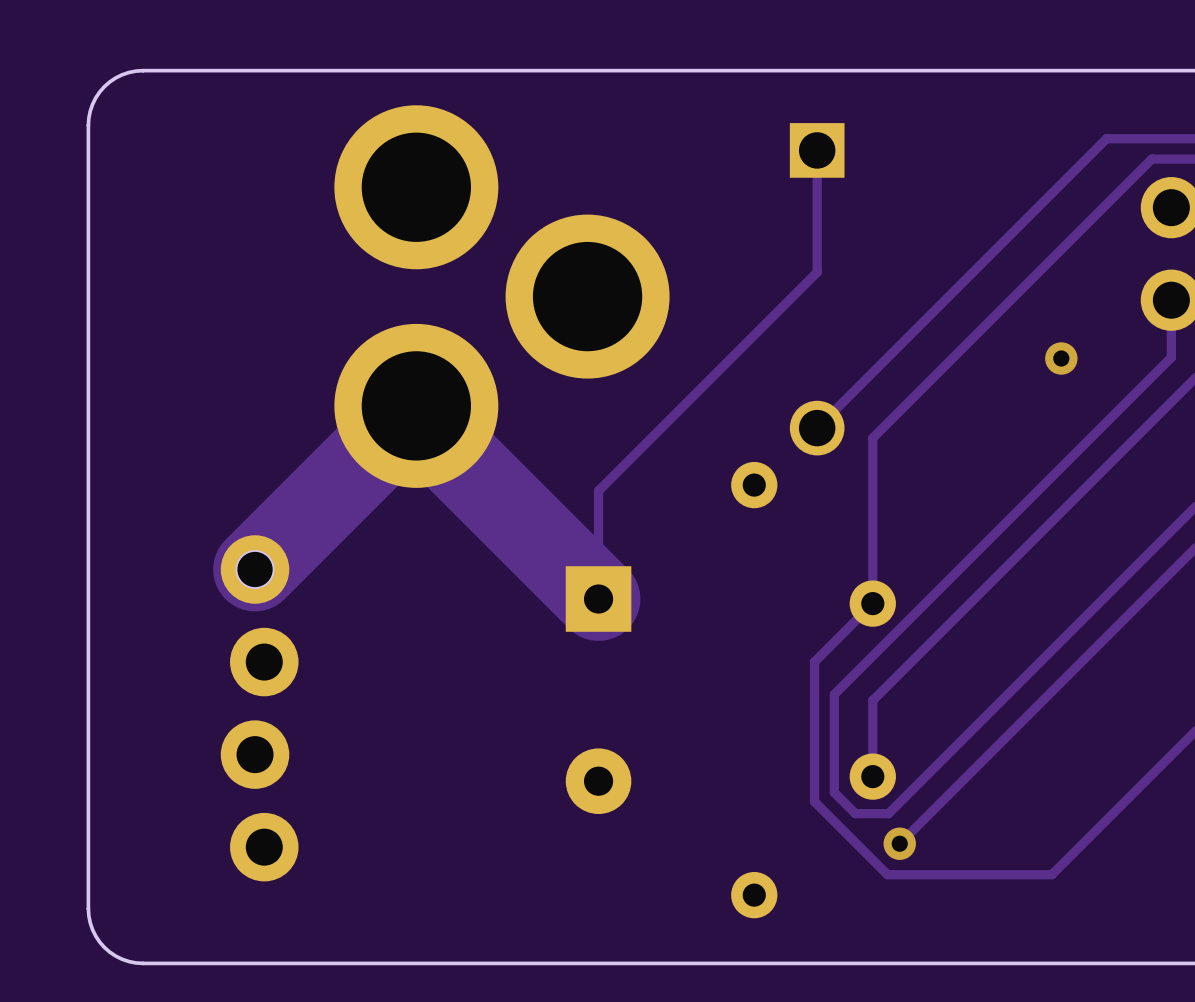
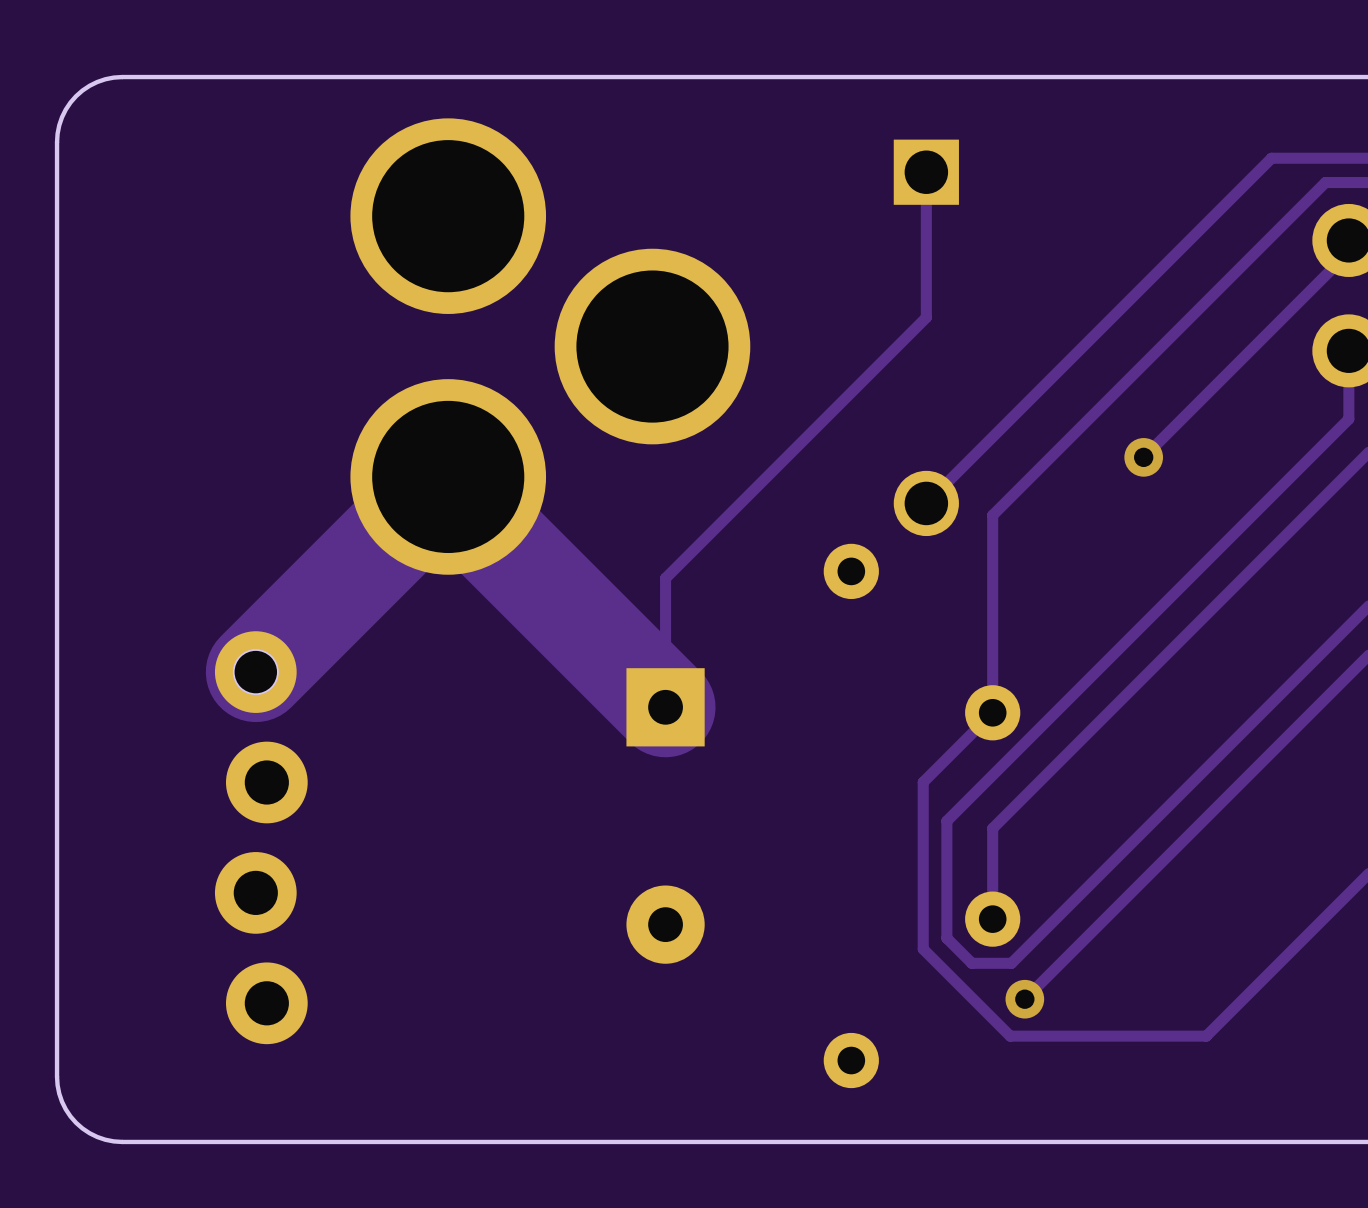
part footprint: [334, 105, 670, 488] -> [350, 118, 751, 575]
track: none -> (1348, 240) (1348, 252) (1143, 457)
via position: (1061, 358) -> (1143, 457)

